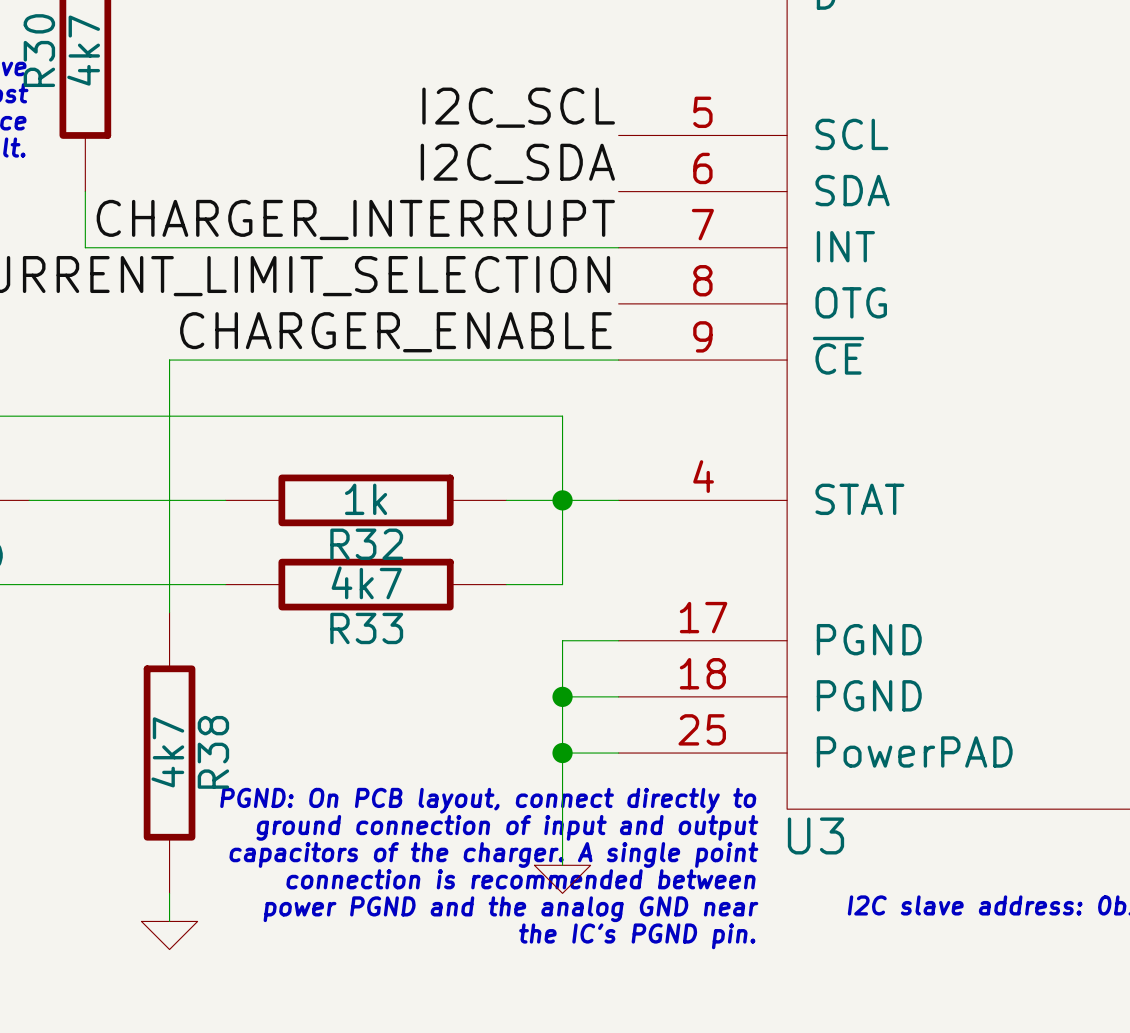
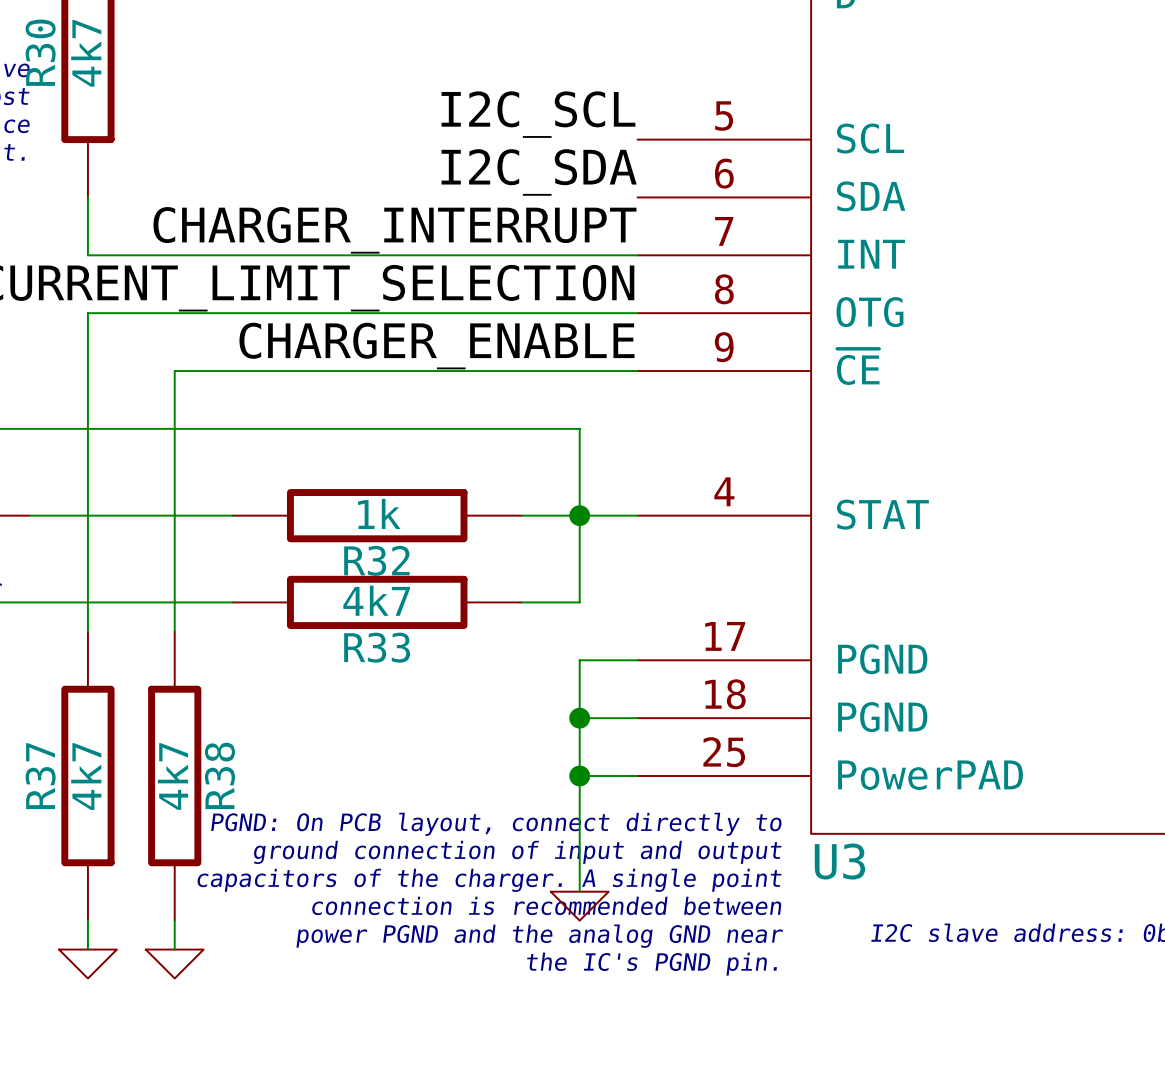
wire: none -> (637, 313) (87, 313) (87, 631)
R37: none -> 4k7 (87, 776)
wire: none -> (87, 920) (87, 949)
power symbol: none -> (87, 964)

